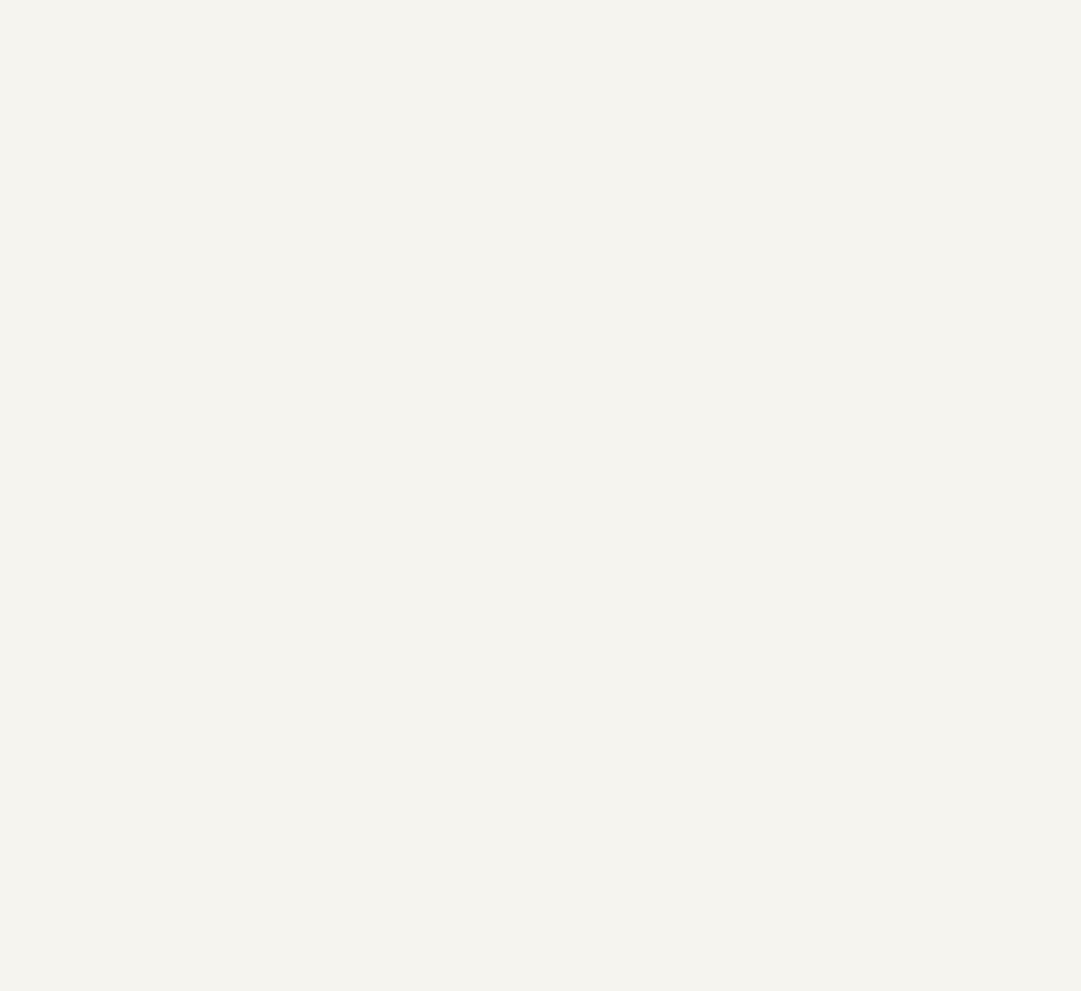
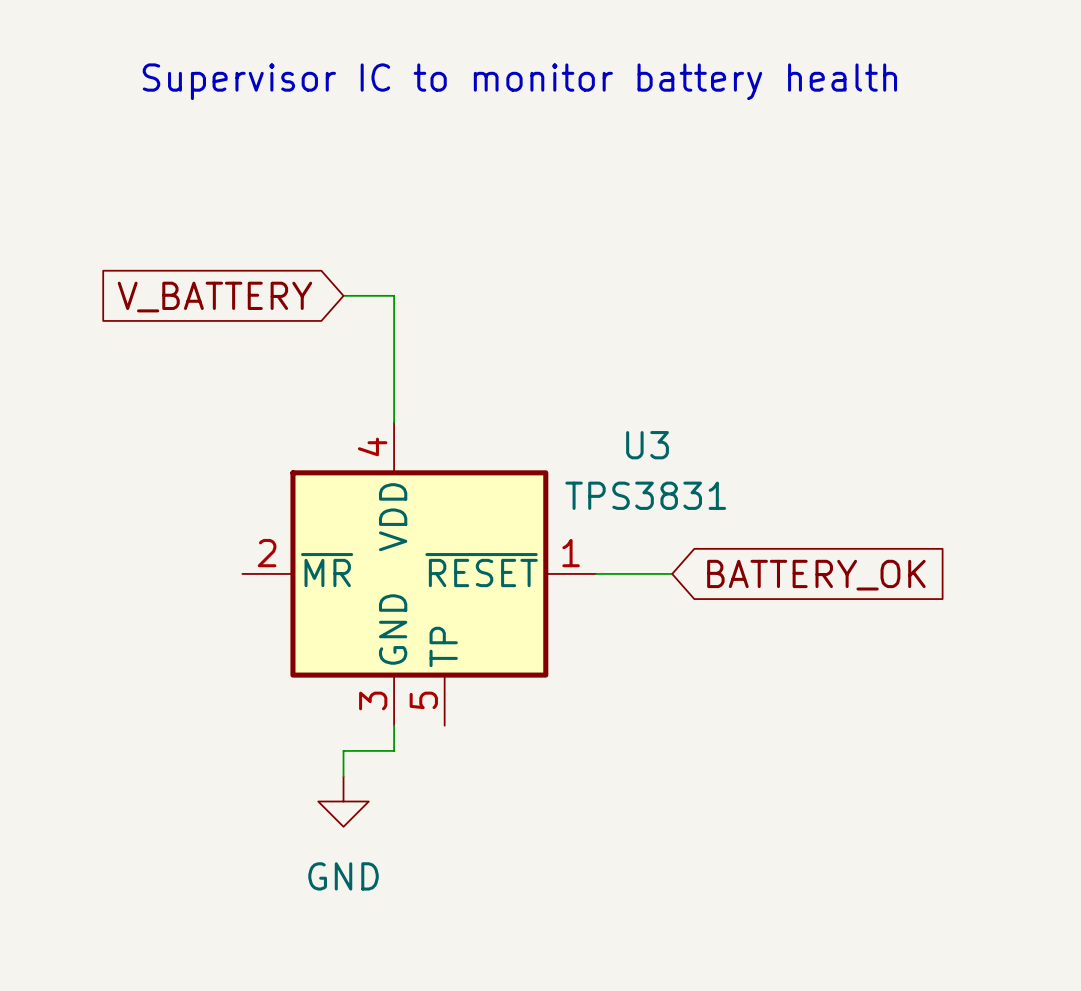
text: none -> Supervisor IC to monitor battery health (519, 81)
wire: none -> (343, 295) (394, 295) (394, 422)
global label: none -> V_BATTERY (214, 297)
U3: none -> TPS3831 (419, 573)
wire: none -> (596, 573) (672, 573)
global label: none -> BATTERY_OK (816, 575)
wire: none -> (394, 725) (394, 750) (343, 750) (343, 776)
power symbol: none -> GND (343, 801)

